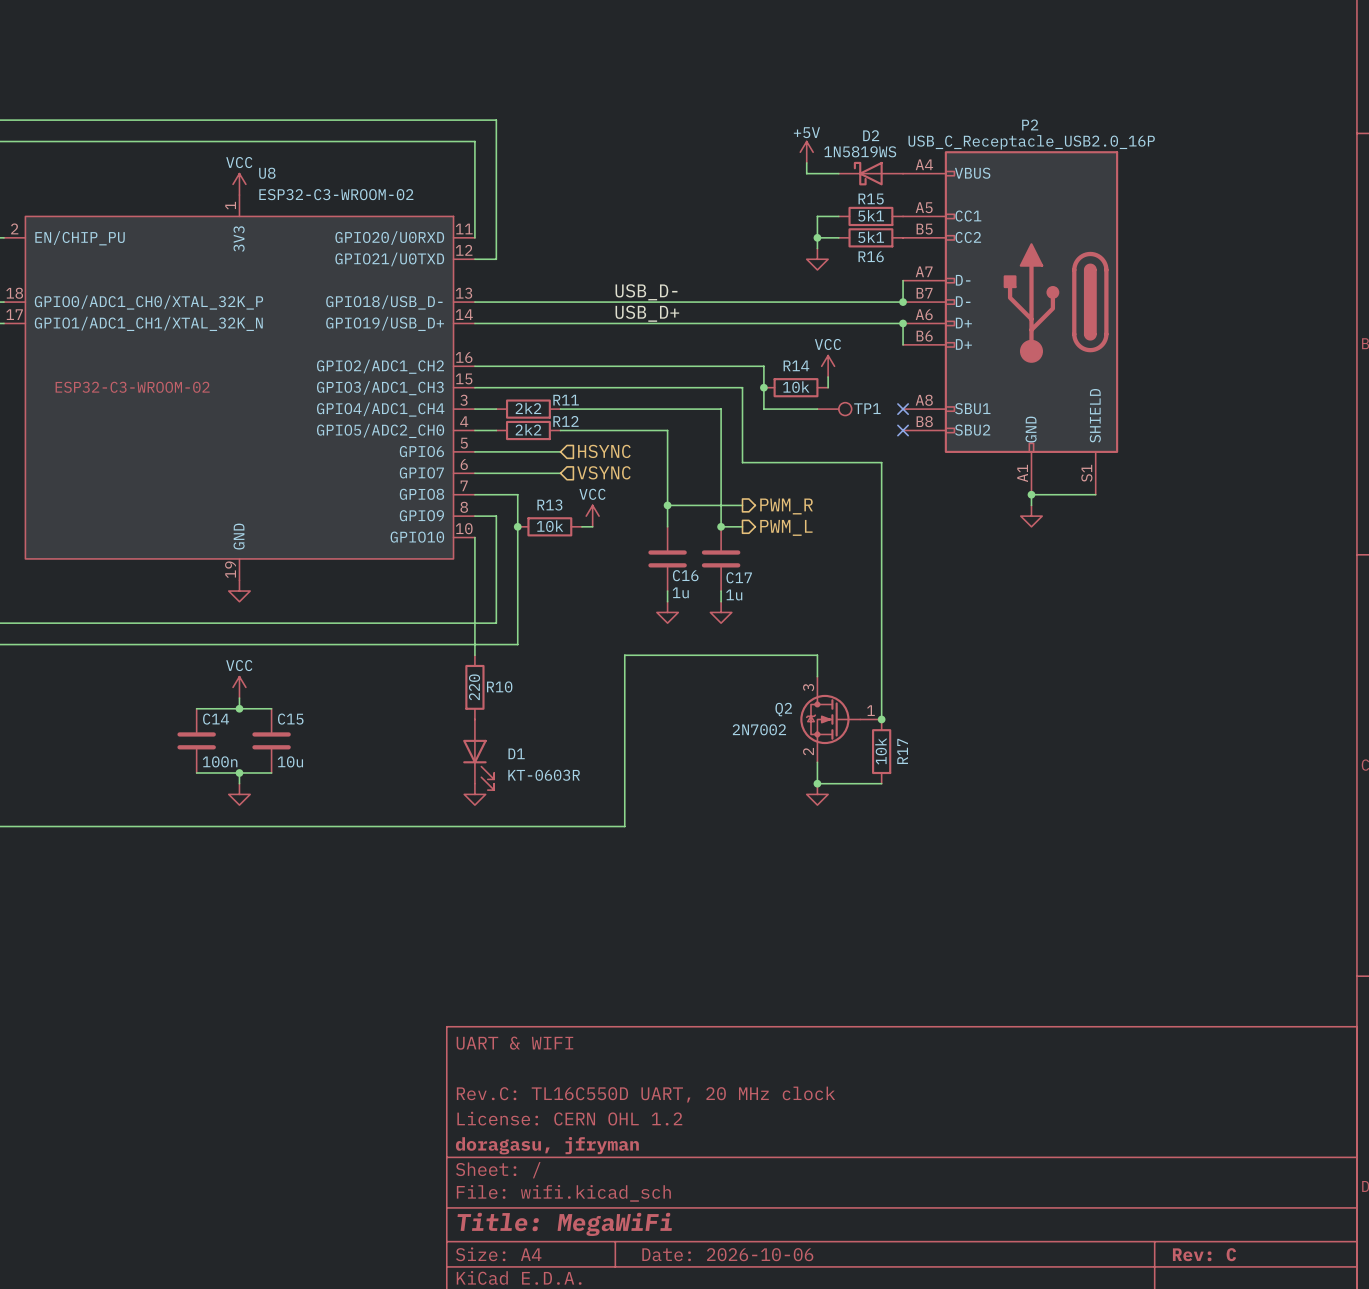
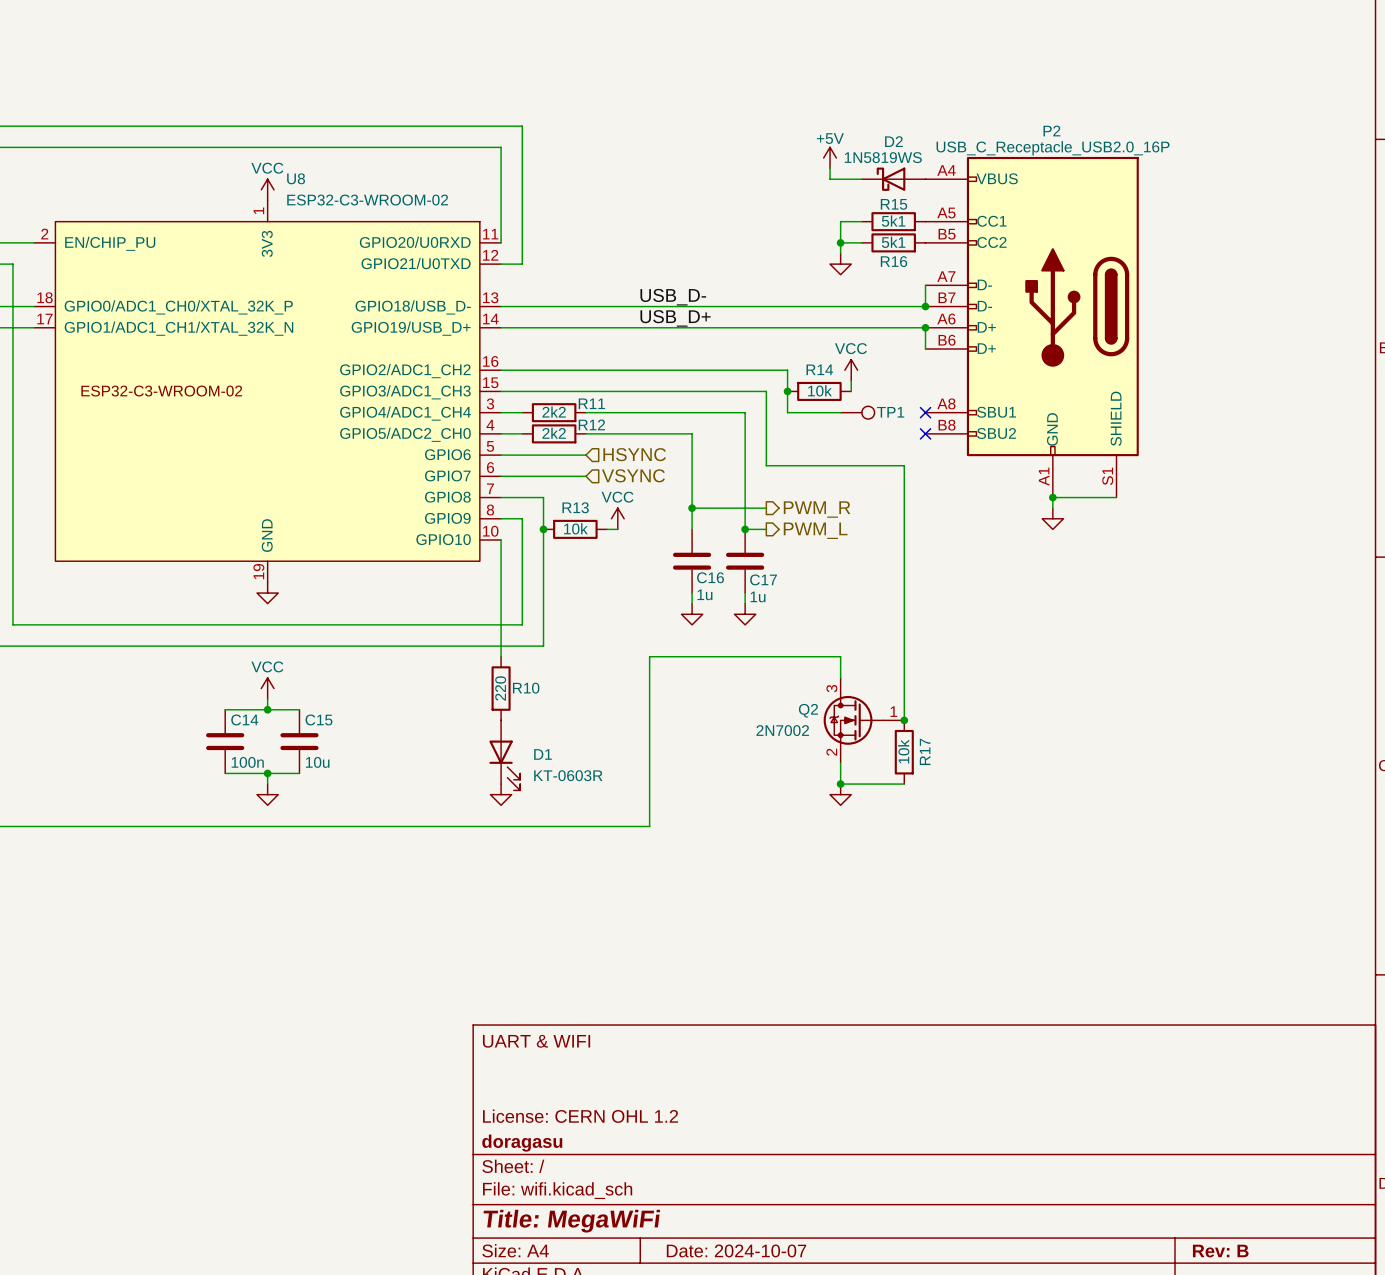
title block: Rev.C: TL16C550D UART, 20 MHz clock (645, 1094) -> none
title block: doragasu, jfryman (547, 1145) -> doragasu (522, 1143)
title block: Date: 2026-10-06 (727, 1254) -> Date: 2024-10-07 (736, 1250)
title block: Rev: C (1204, 1254) -> Rev: B (1220, 1251)

